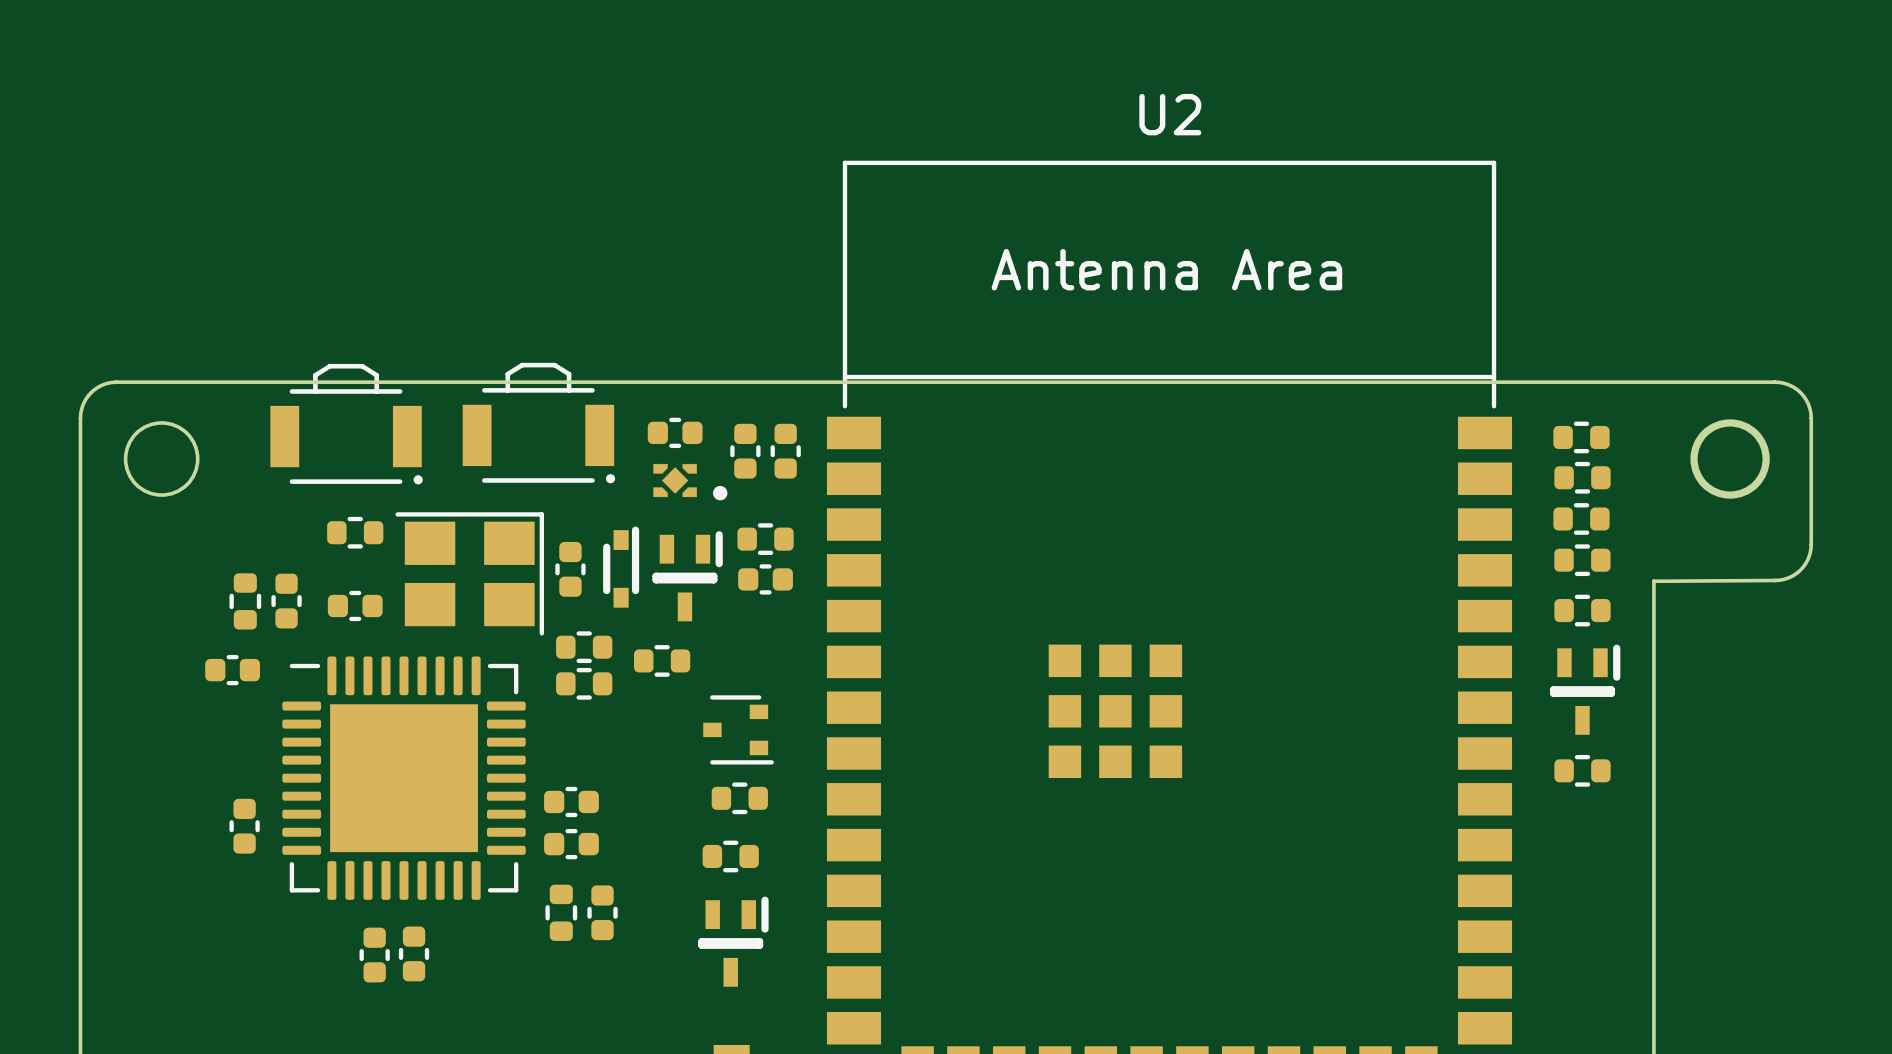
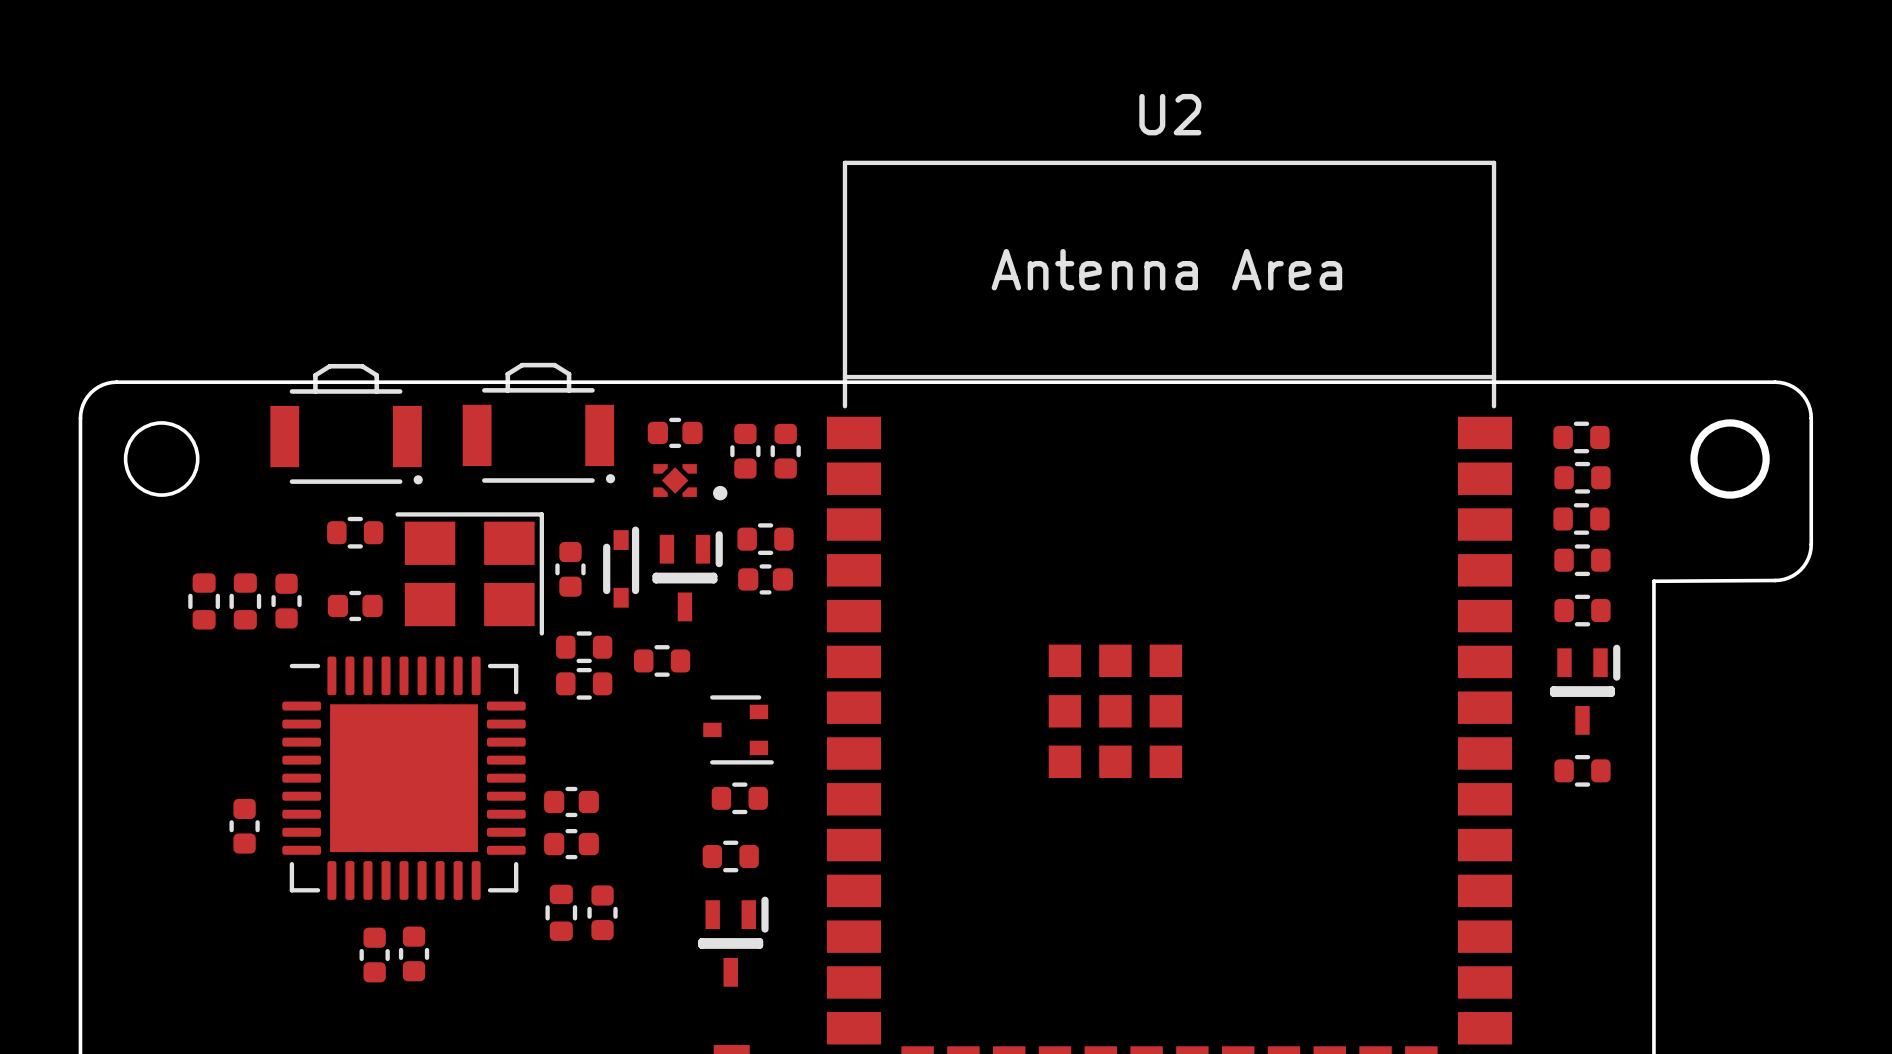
part: none -> (204, 601)
part: (232, 670) -> none

